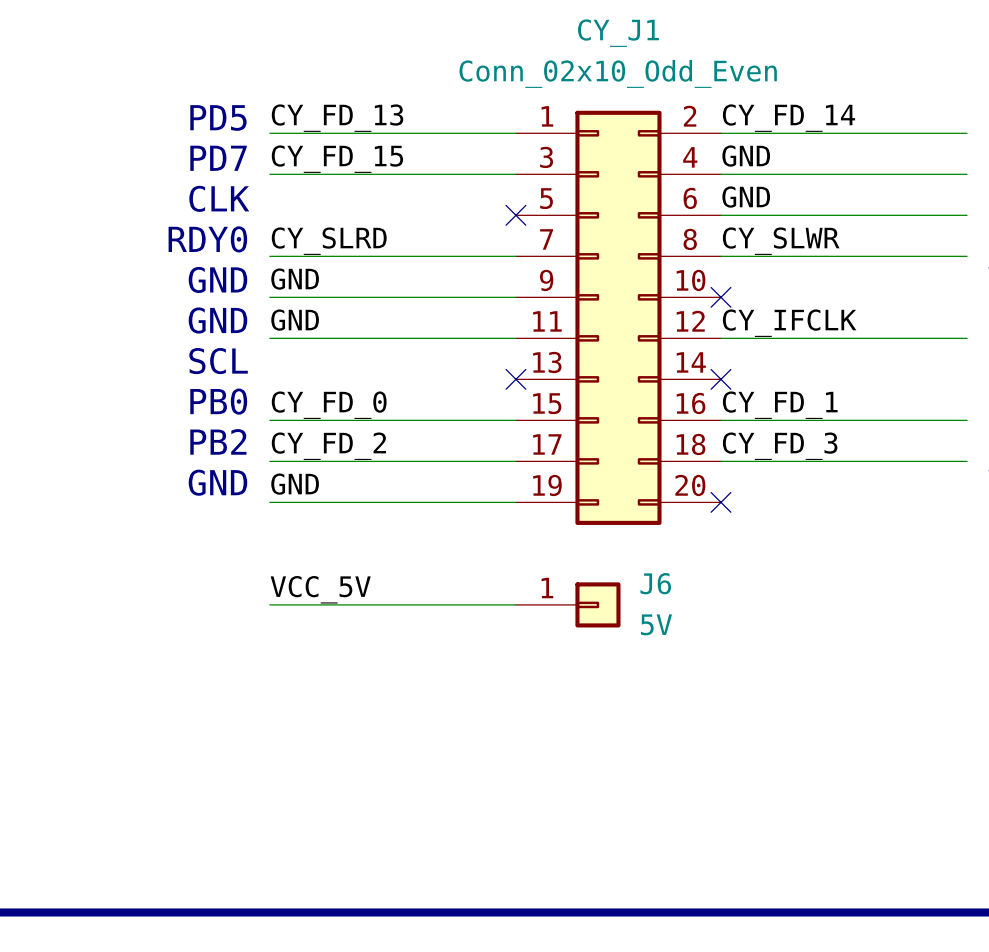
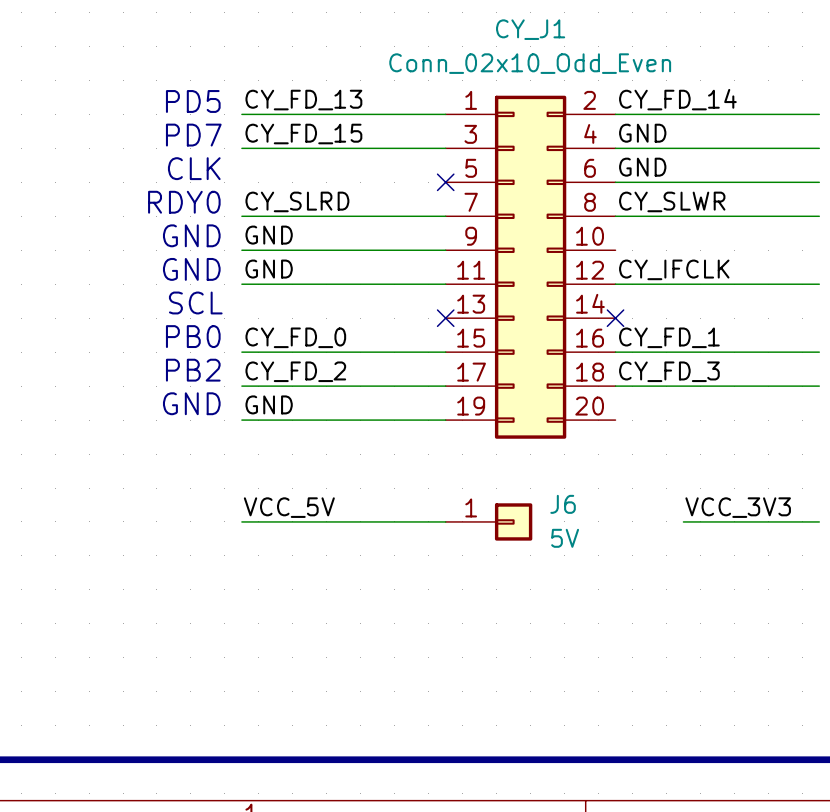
no-connect mark: (720, 297) -> none
no-connect mark: (720, 502) -> none
label position: VCC_5V (320, 589) -> VCC_5V (289, 507)
wire: (269, 604) (515, 604) -> (241, 521) (445, 521)
J6 position: (568, 604) -> (488, 521)
label: none -> VCC_3V3 (738, 507)
wire: none -> (683, 521) (819, 521)

